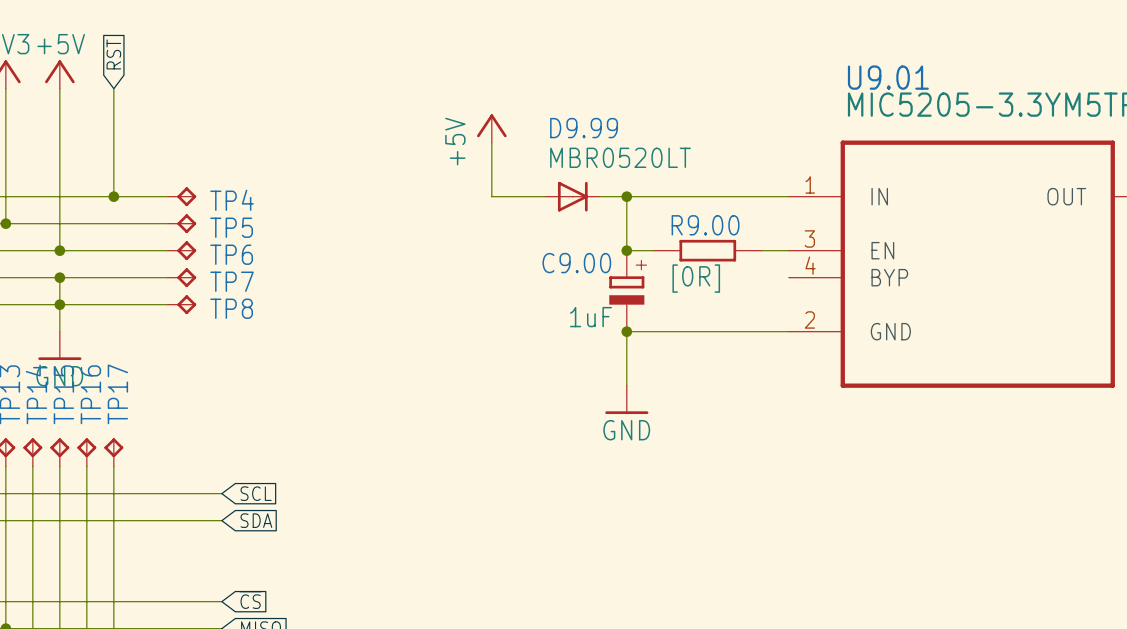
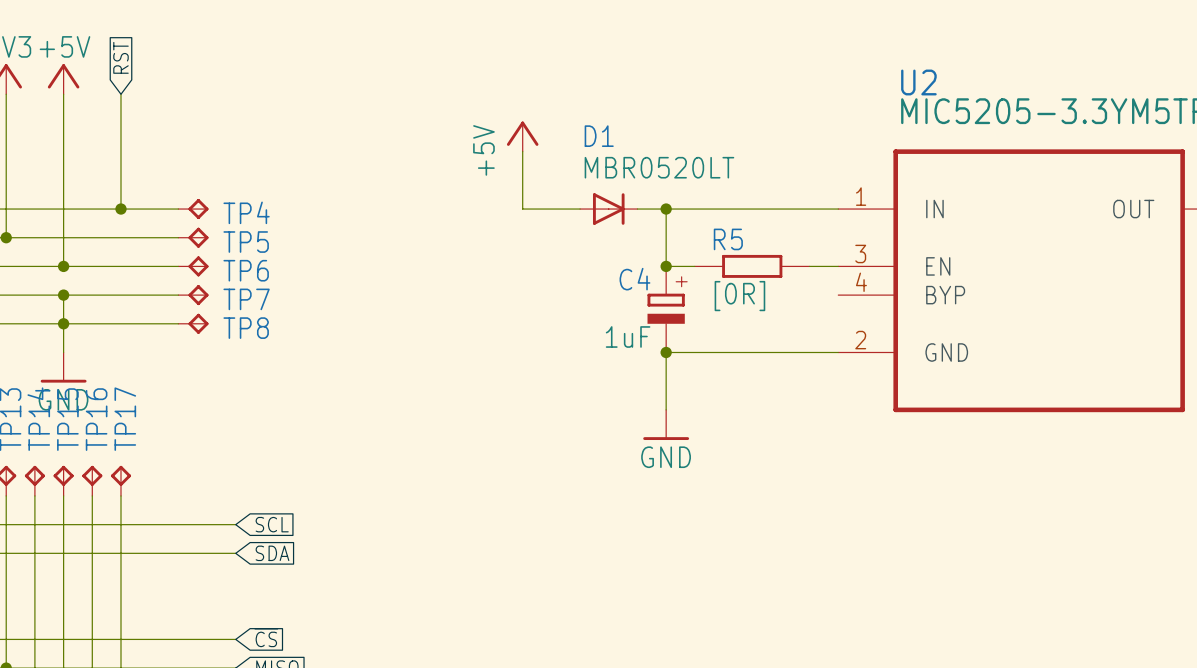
U9.01 name: U9.01 (888, 77) -> U2 (918, 82)
D9.99 name: D9.99 (584, 128) -> D1 (599, 136)
R9.00 name: R9.00 (705, 225) -> R5 (728, 239)
C9.00 name: C9.00 (576, 263) -> C4 (634, 279)

